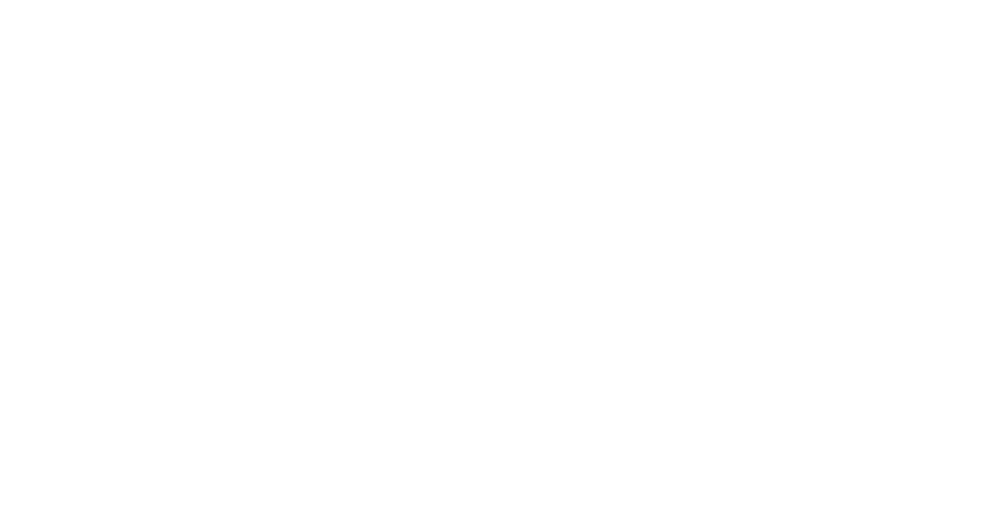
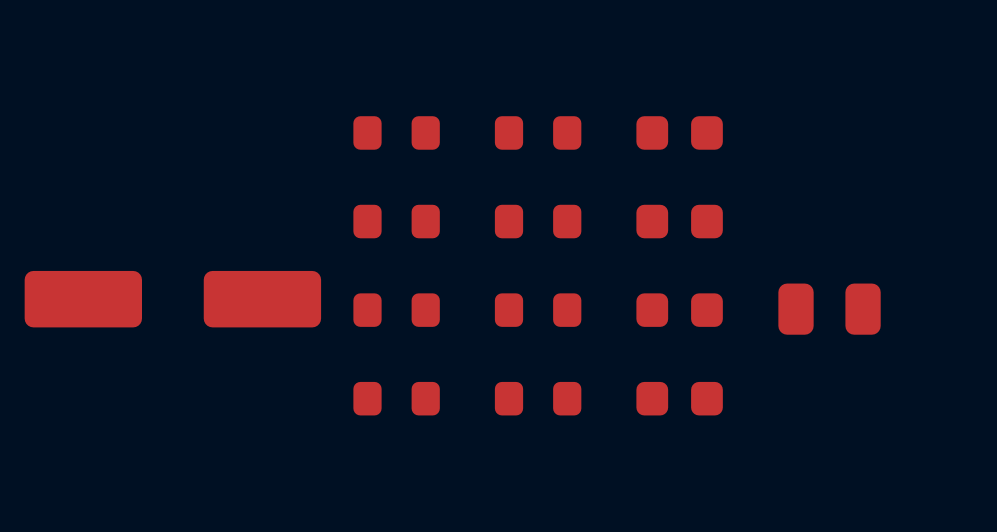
part: none -> (396, 132)
part: none -> (538, 132)
part: none -> (679, 132)
part: none -> (396, 221)
part: none -> (538, 221)
part: none -> (679, 221)
part: none -> (172, 299)
part: none -> (829, 309)
part: none -> (396, 310)
part: none -> (538, 310)
part: none -> (679, 310)
part: none -> (396, 398)
part: none -> (538, 398)
part: none -> (679, 398)

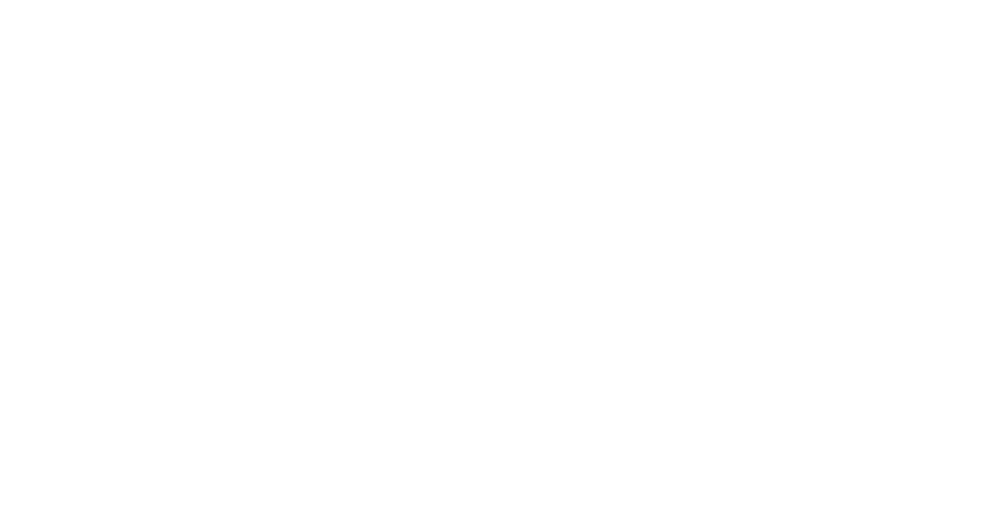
part: (396, 132) -> none
part: (538, 132) -> none
part: (679, 132) -> none
part: (396, 221) -> none
part: (538, 221) -> none
part: (679, 221) -> none
part: (172, 299) -> none
part: (829, 309) -> none
part: (396, 310) -> none
part: (538, 310) -> none
part: (679, 310) -> none
part: (396, 398) -> none
part: (538, 398) -> none
part: (679, 398) -> none

